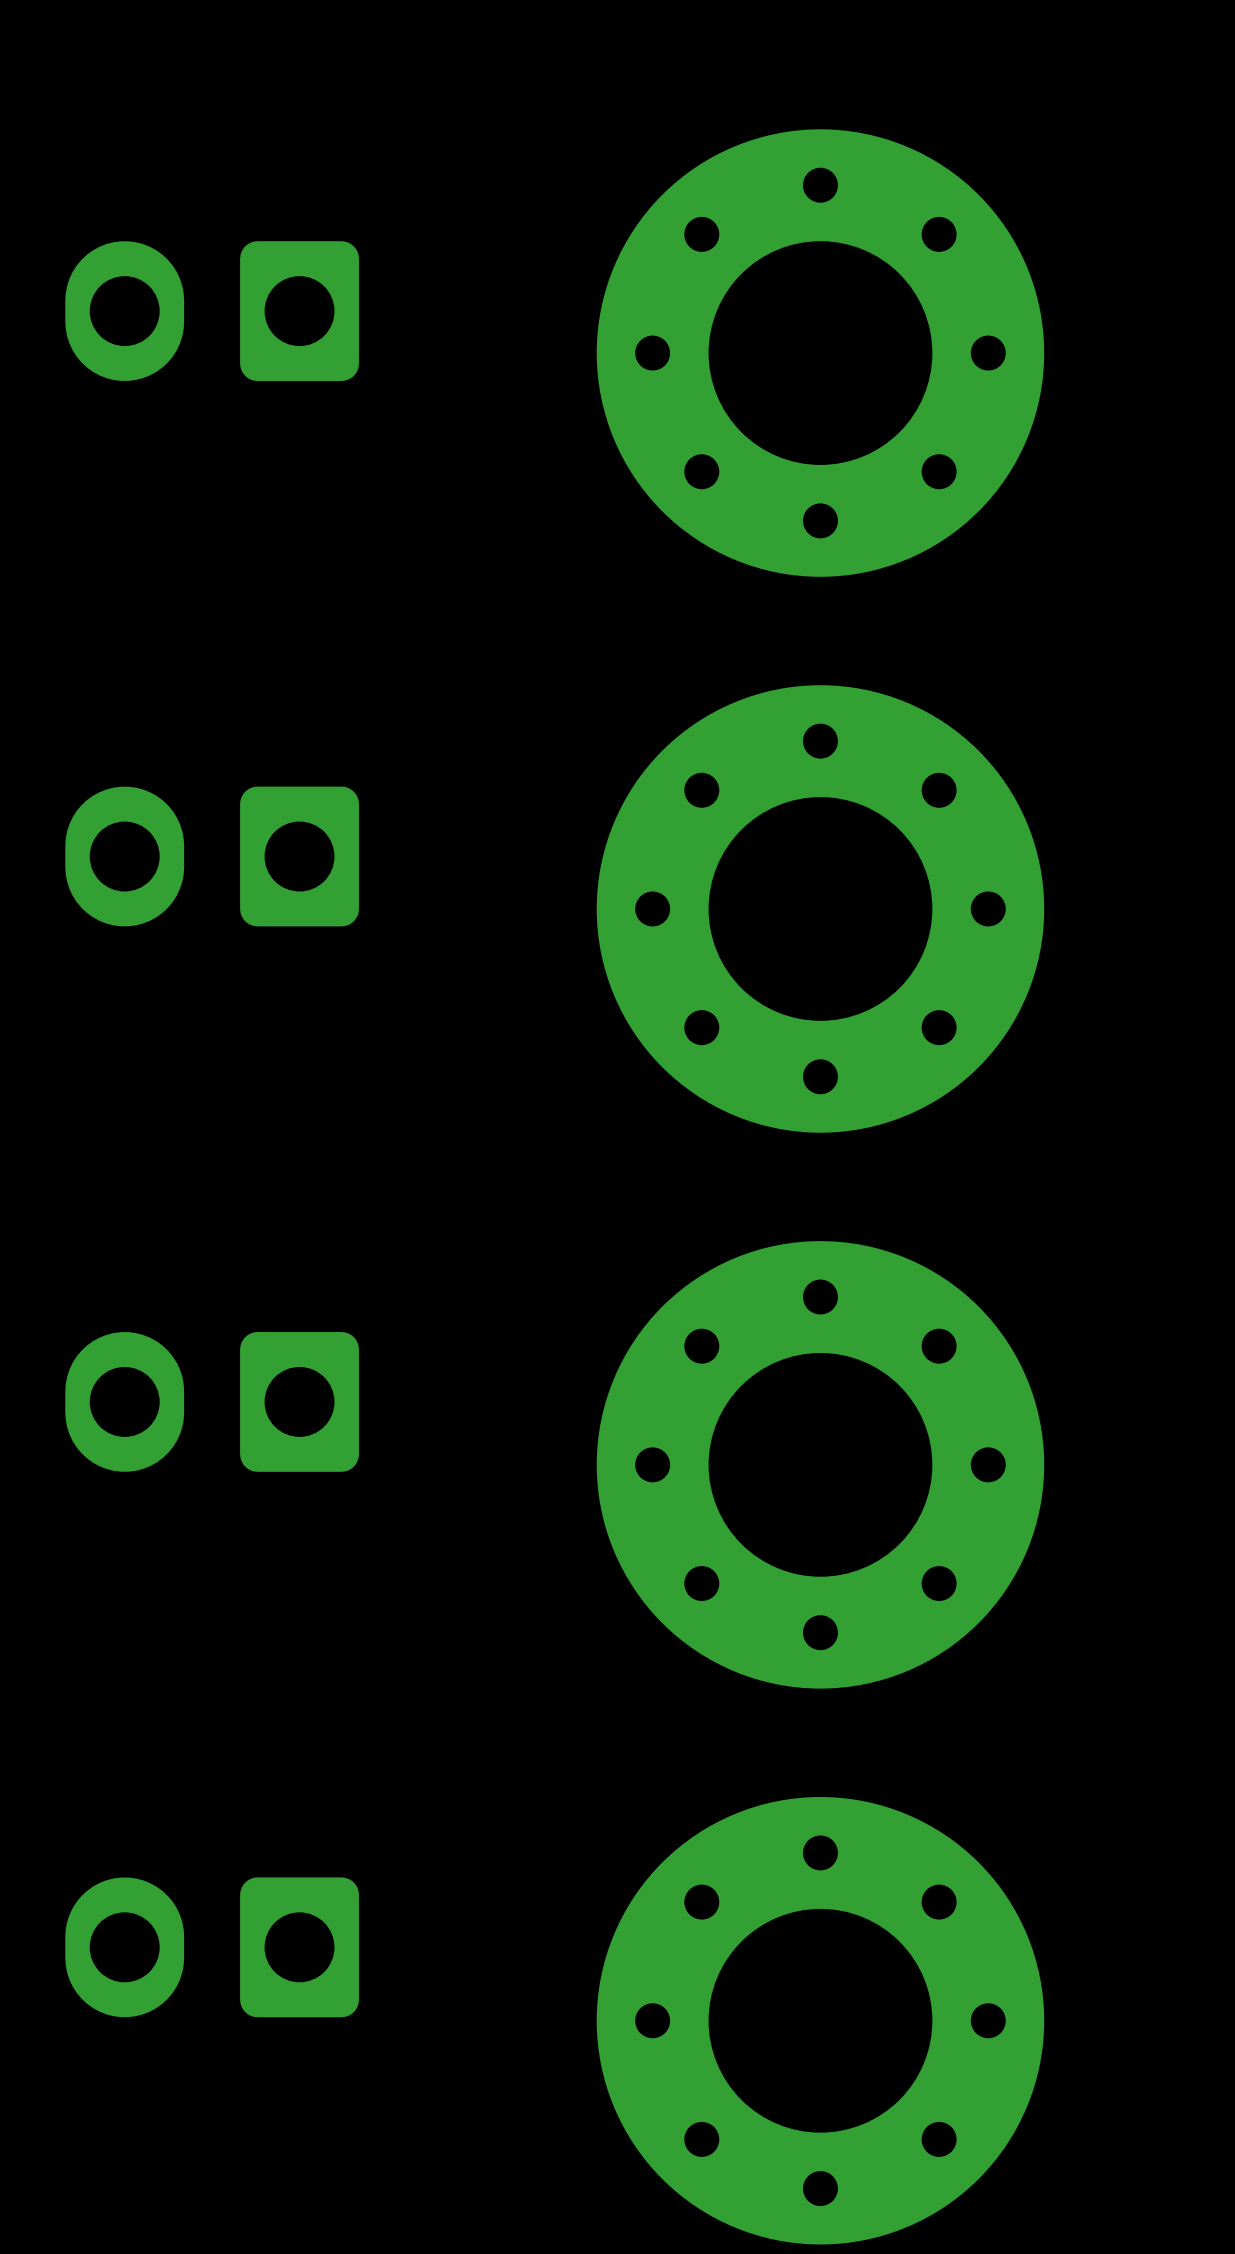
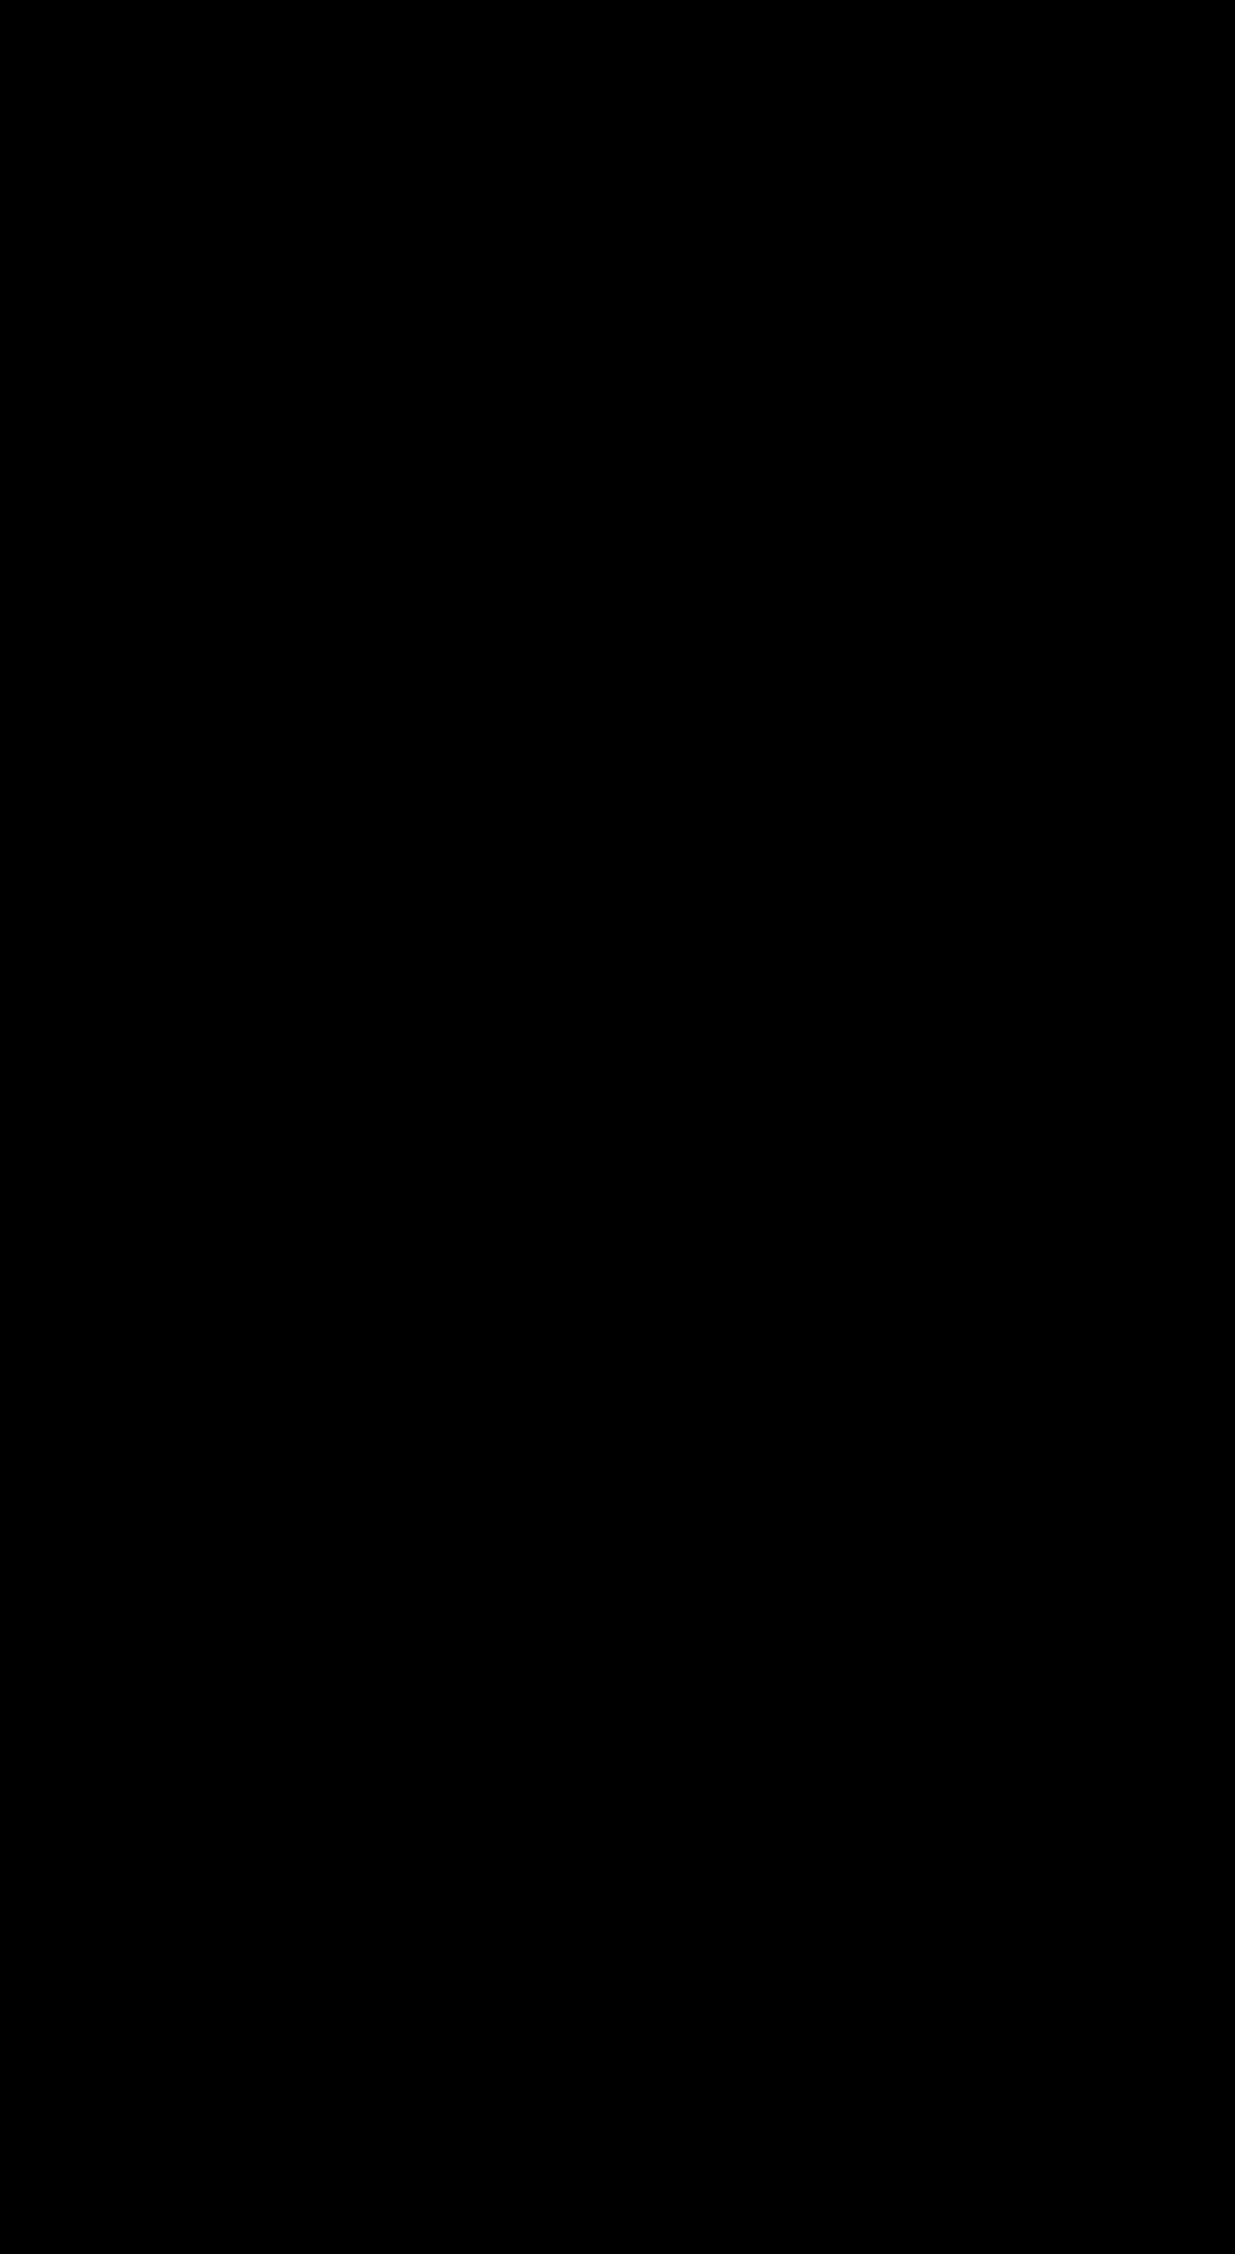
part: (212, 311) -> none
part: (820, 353) -> none
part: (212, 856) -> none
part: (820, 908) -> none
part: (212, 1401) -> none
part: (820, 1464) -> none
part: (212, 1947) -> none
part: (820, 2020) -> none

